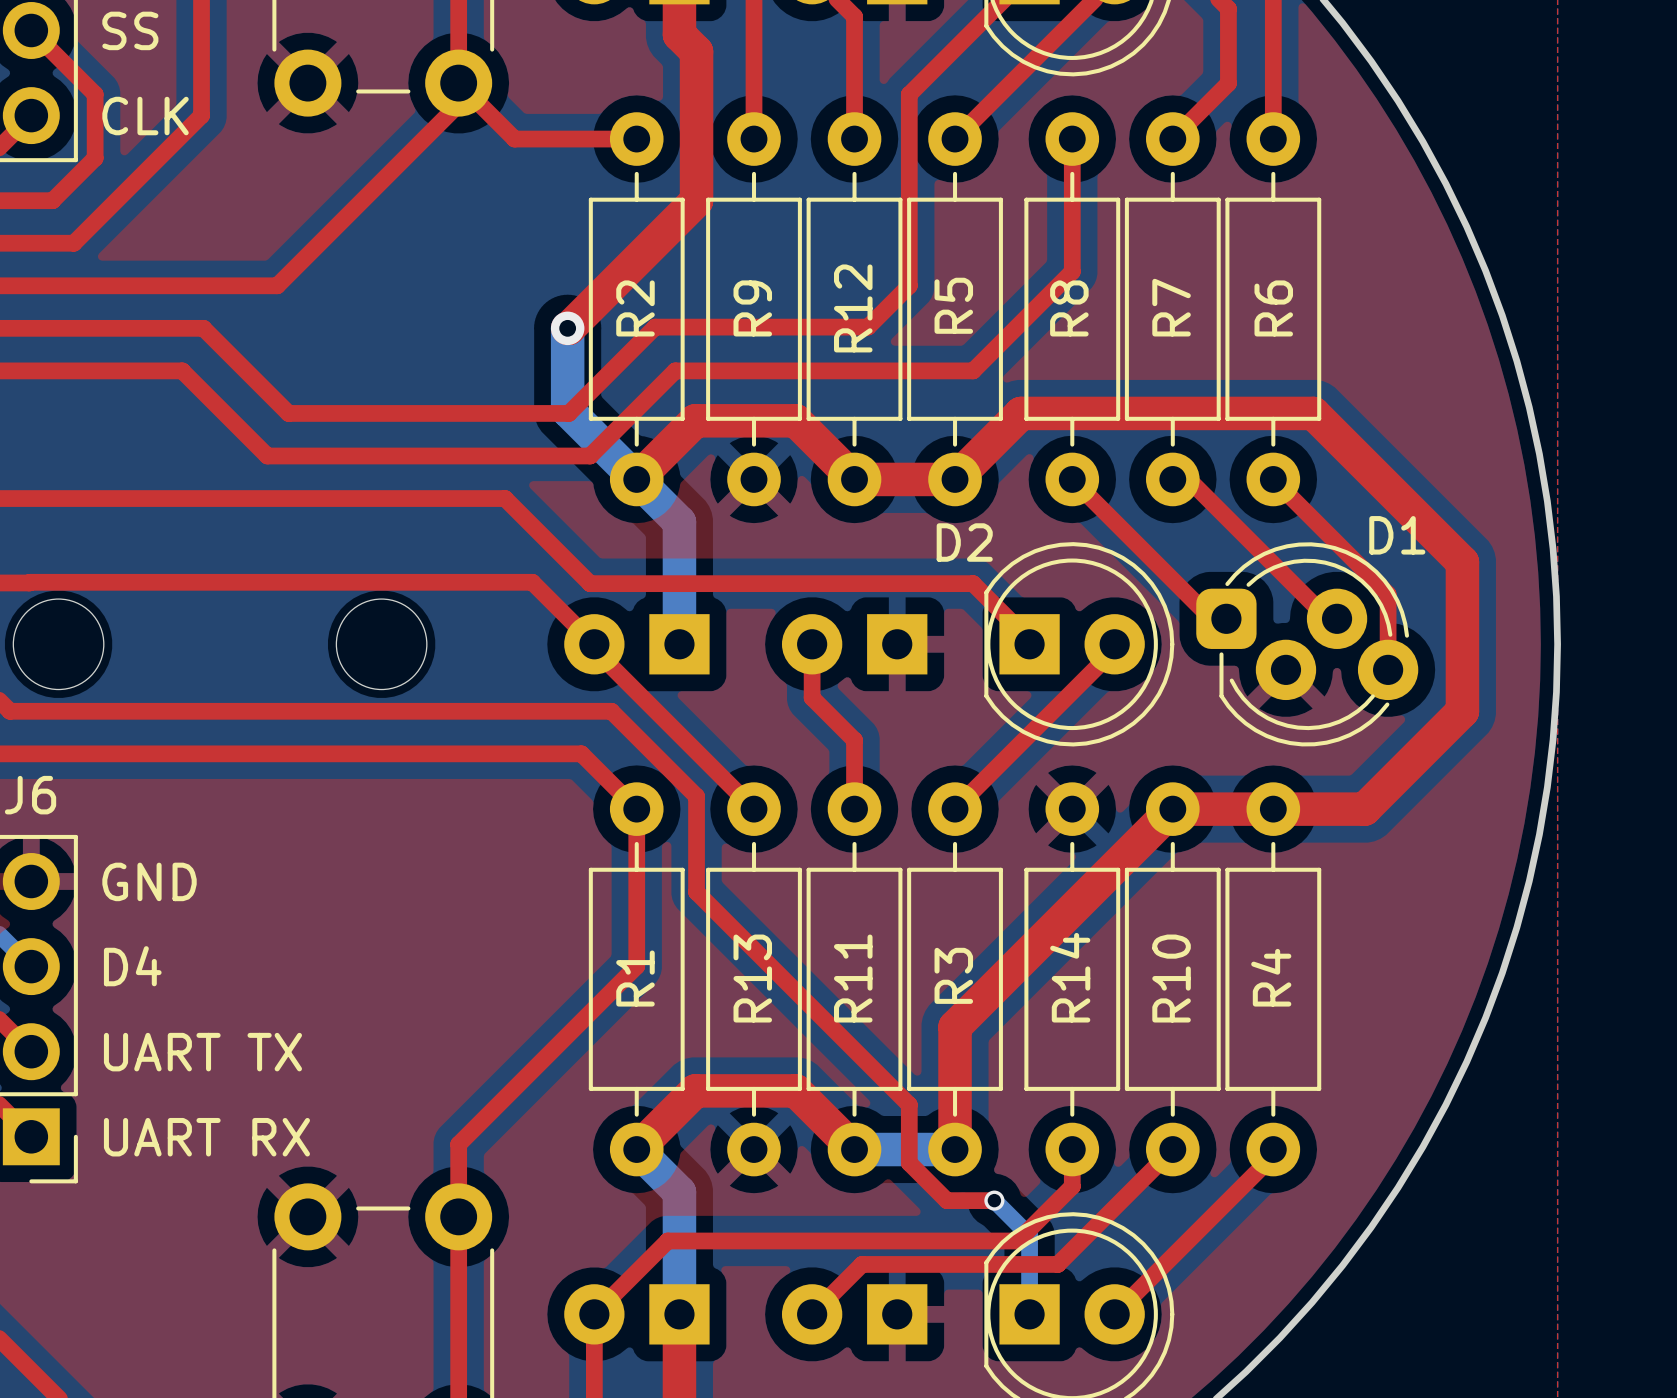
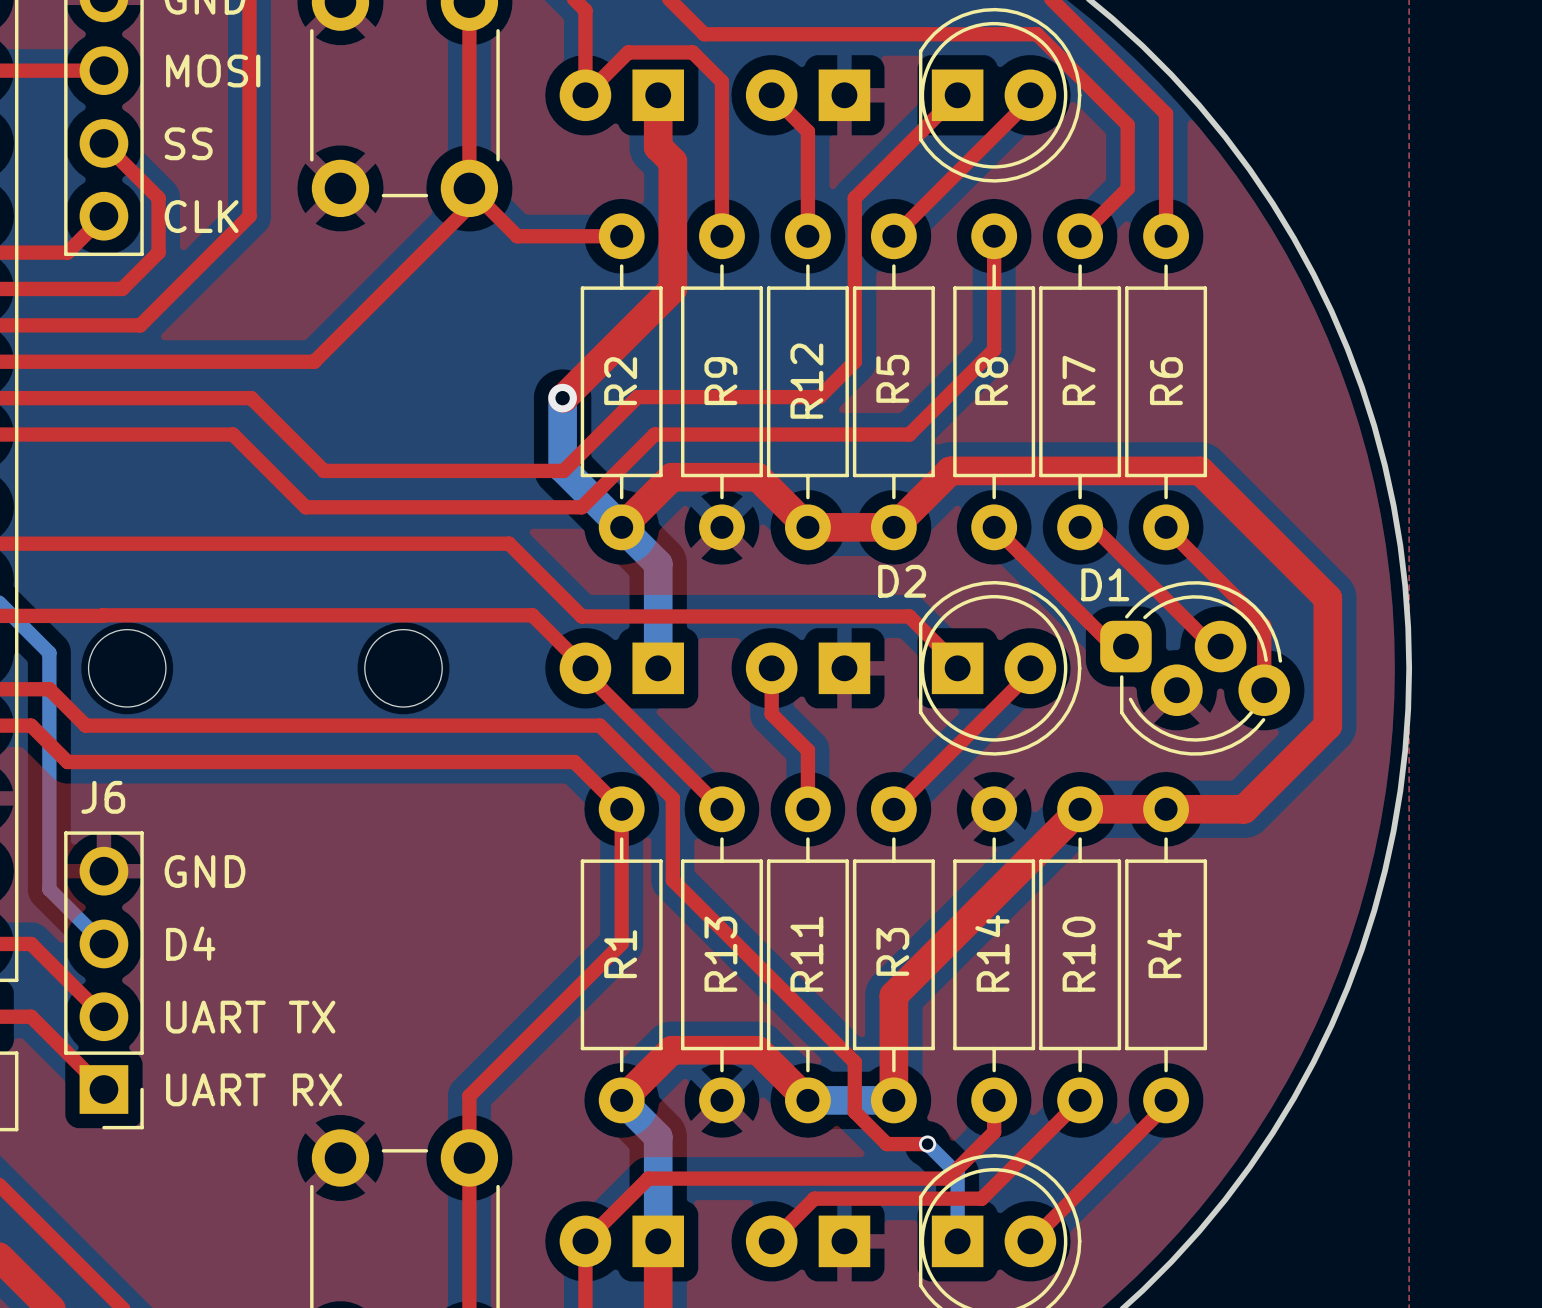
D1 name position: D1 (1397, 535) -> D1 (1105, 584)

